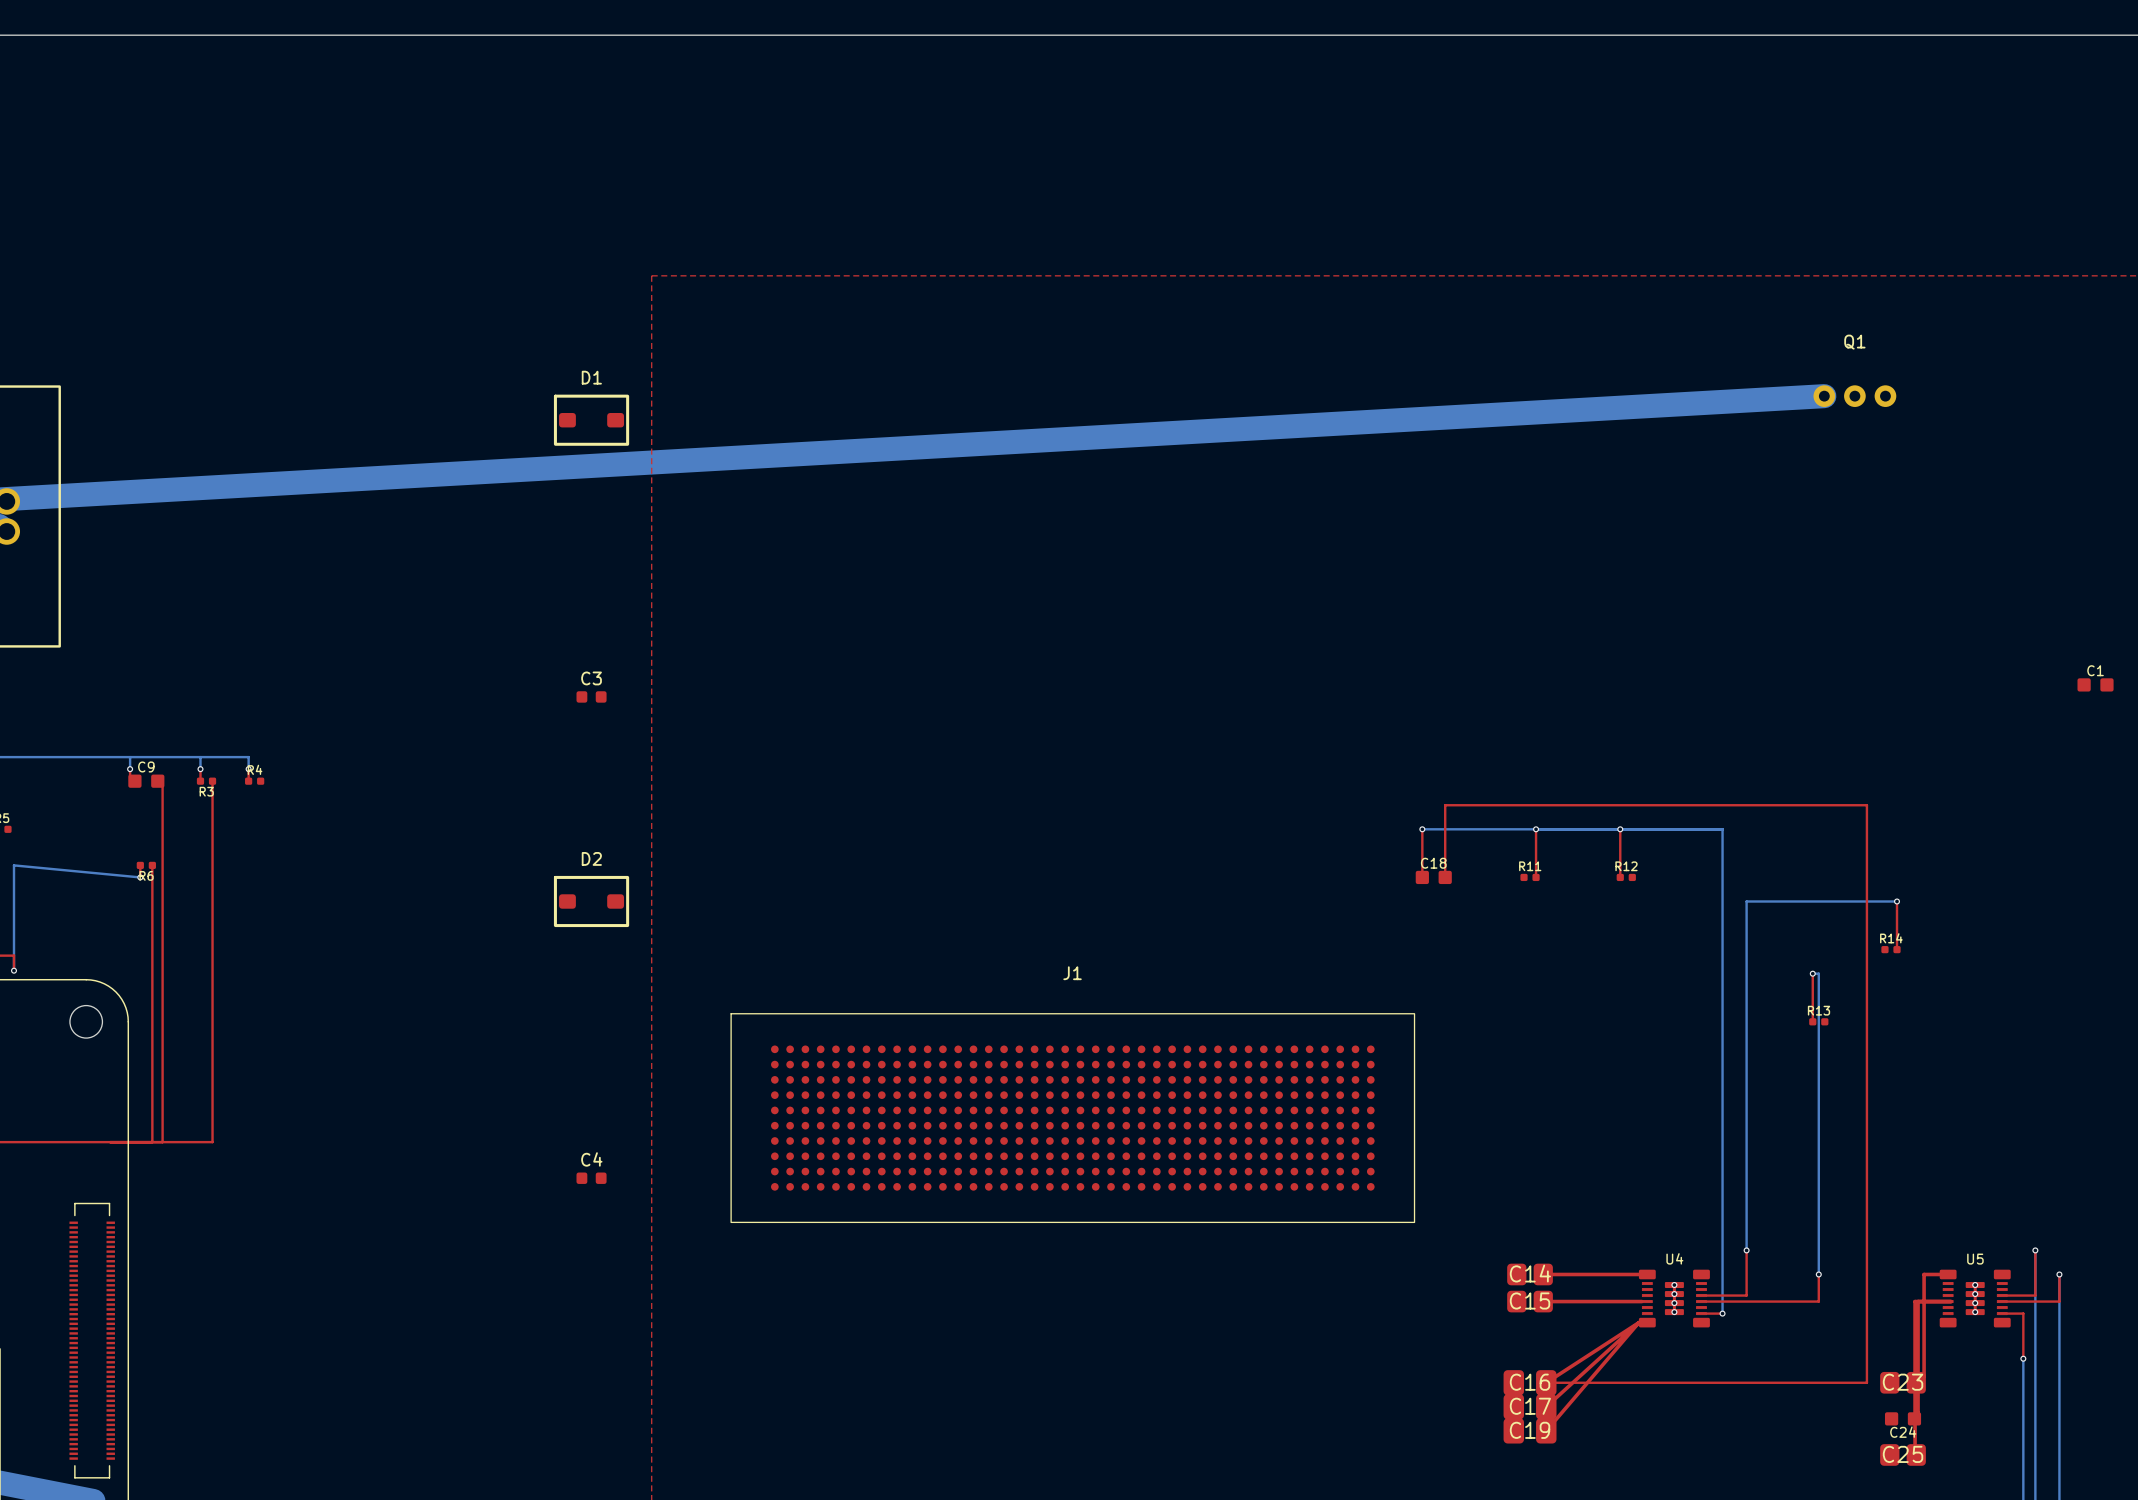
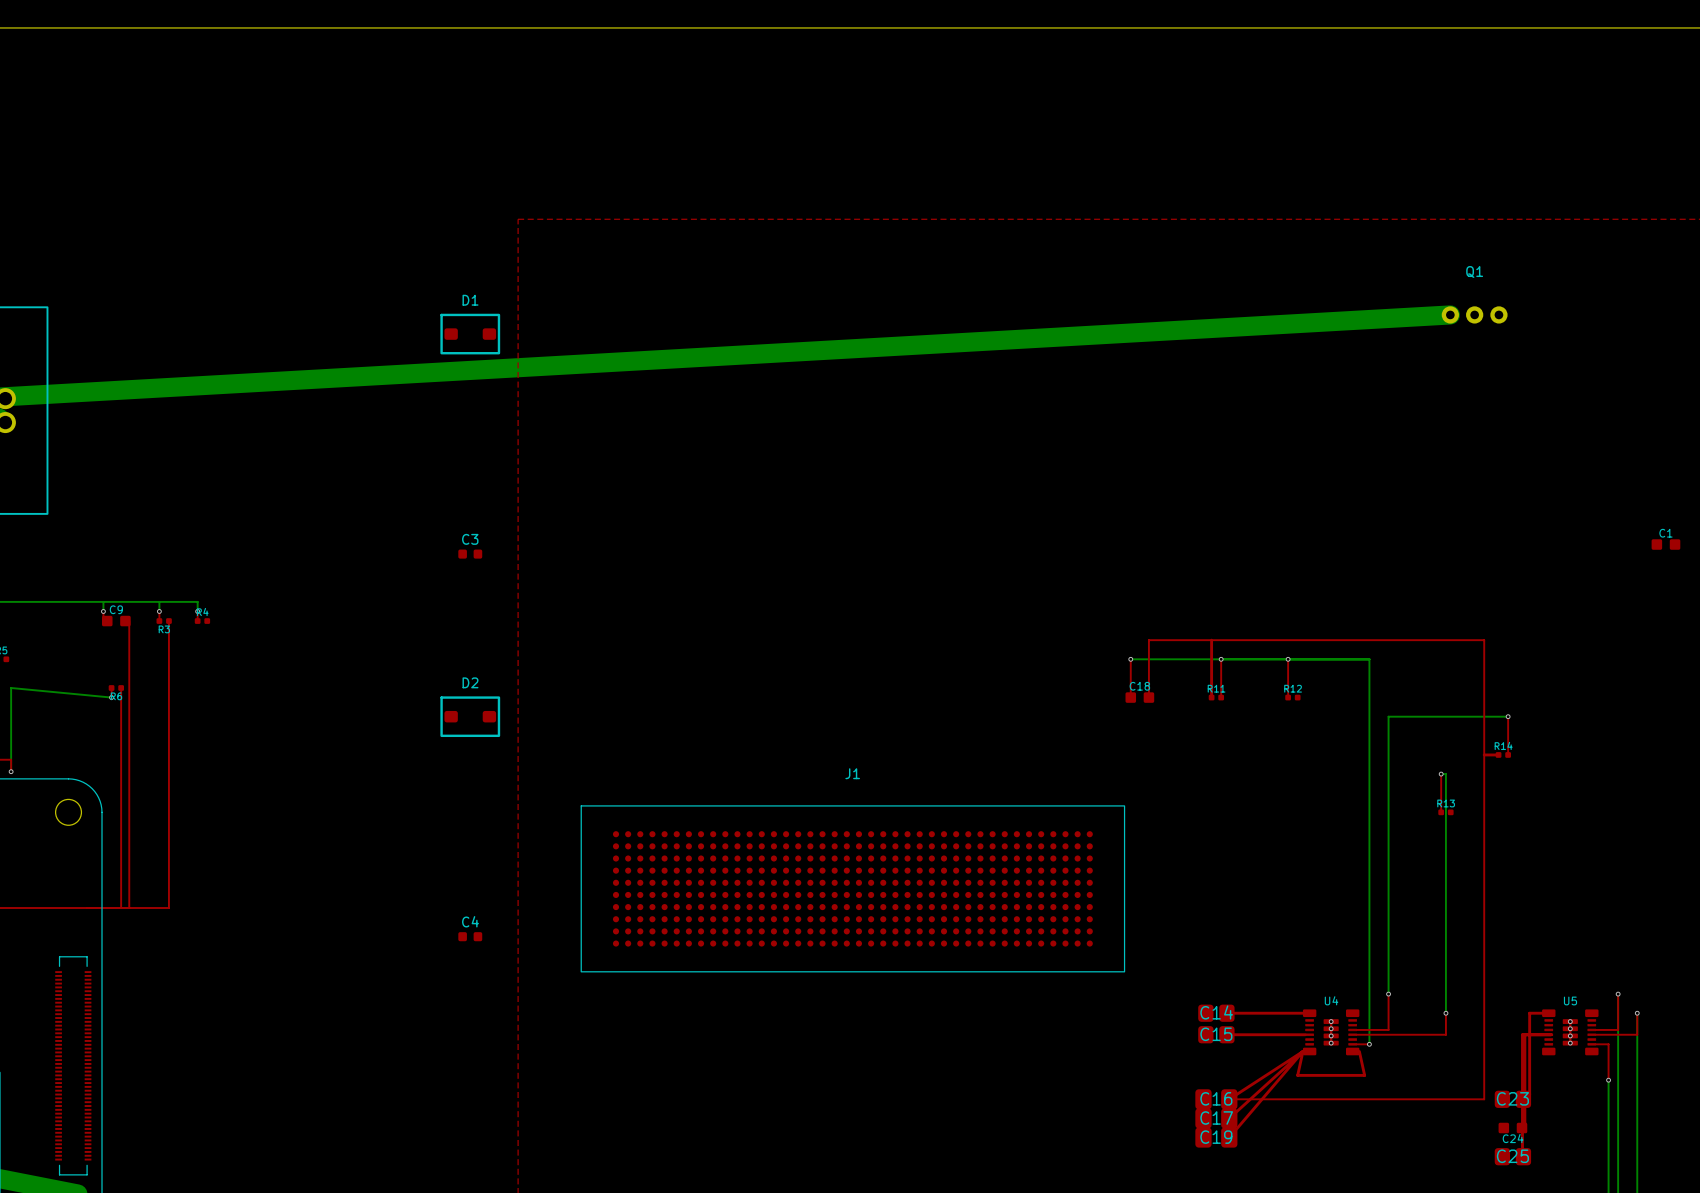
top track: none -> (1211, 640) (1211, 697)
top track: none -> (1484, 754) (1498, 754)
top track: none -> (1302, 1051) (1297, 1075) (1364, 1075) (1359, 1051)

